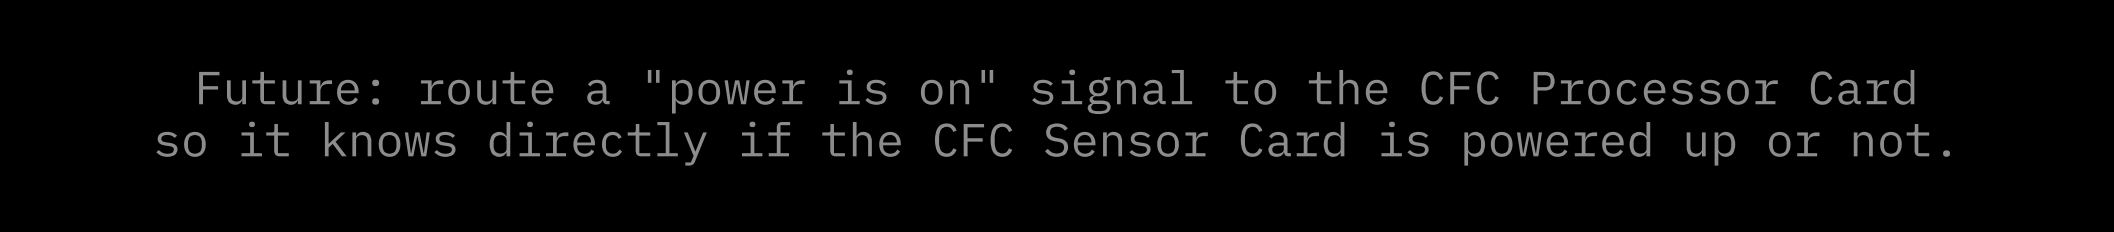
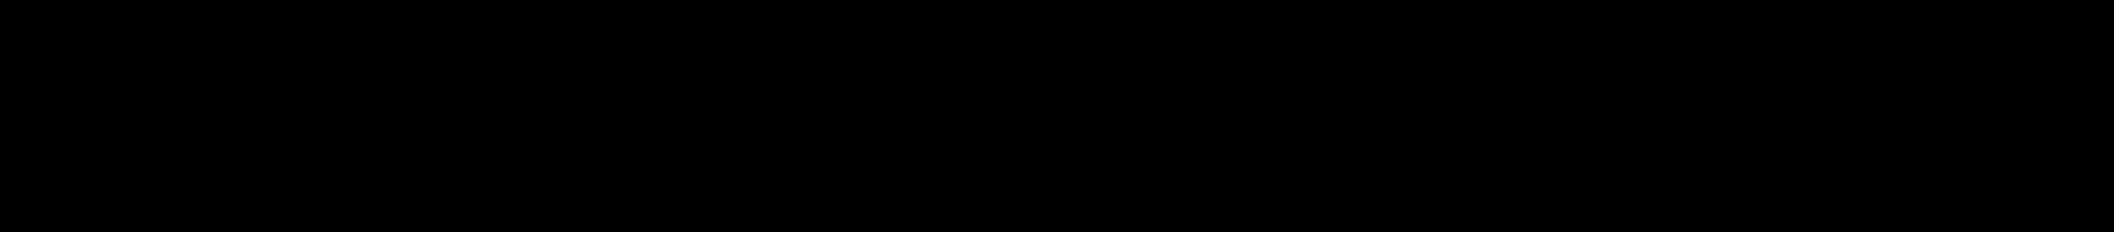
text: Future: route a "power is on" signal to the CFC Processor Card (1056, 91) -> none
text: so it knows directly if the CFC Sensor Card is powered up or not. (1053, 143) -> none

